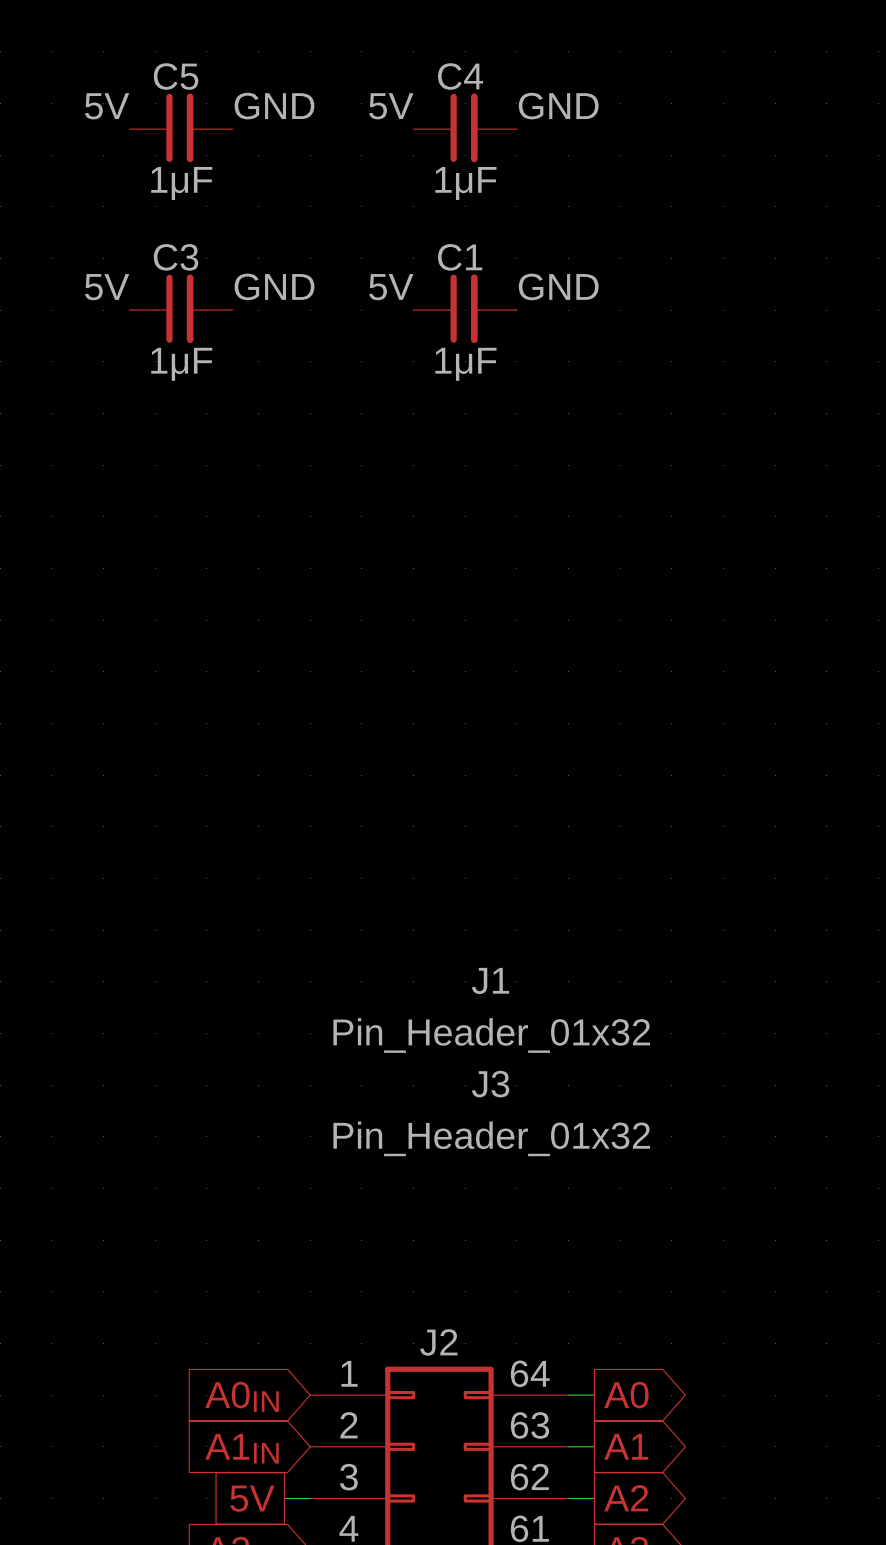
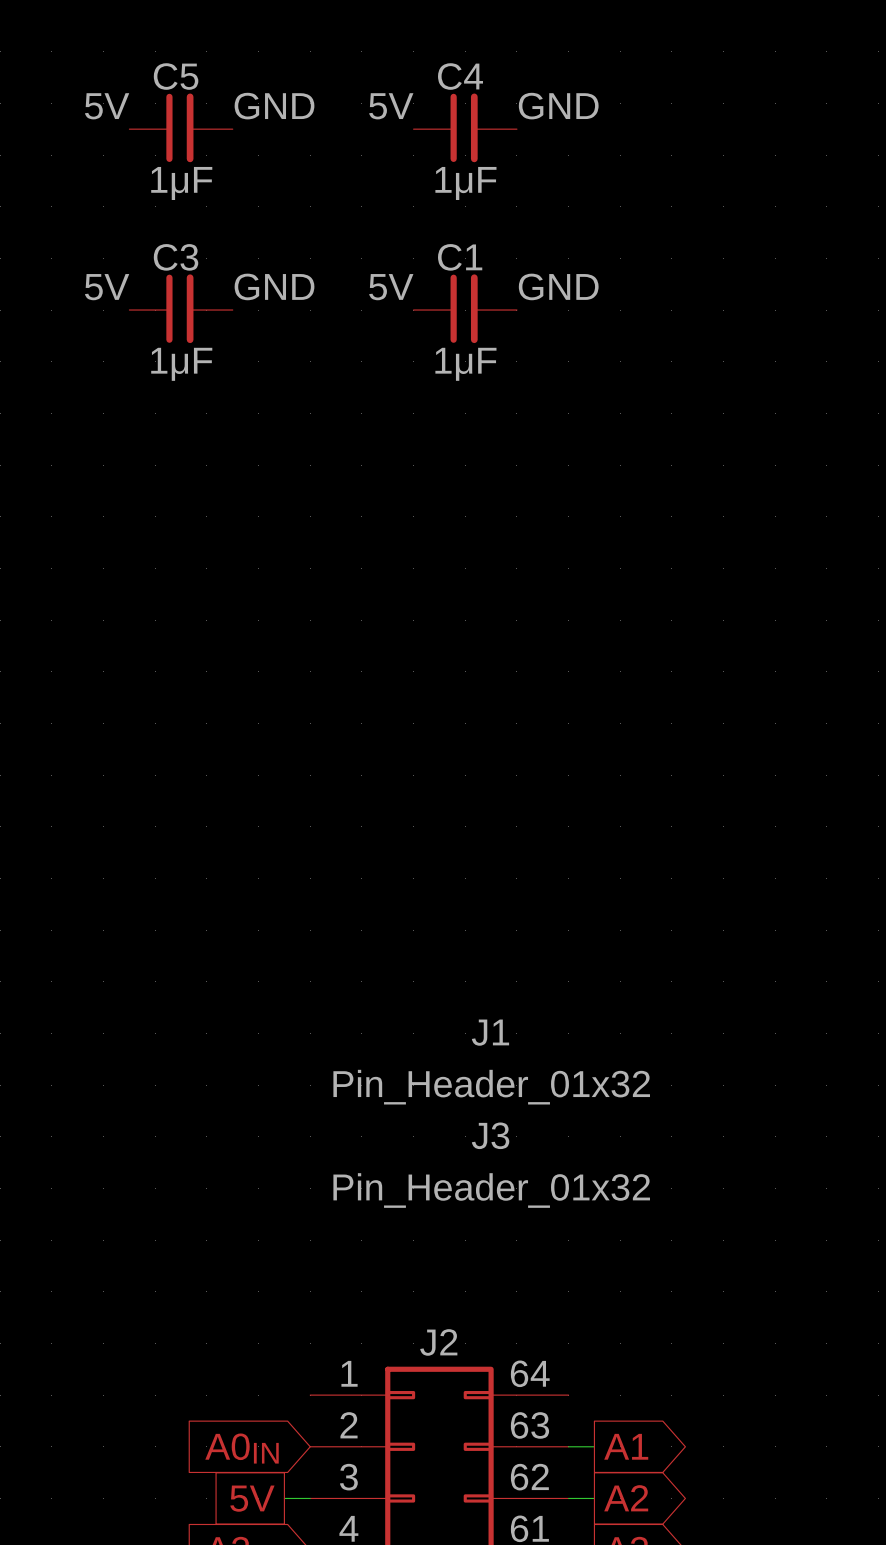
J1 position: (491, 1010) -> (491, 1062)
J3 position: (491, 1113) -> (491, 1165)
wire: (568, 1395) (594, 1395) -> none
global label: A0 (626, 1395) -> none
global label: A0IN (242, 1396) -> none
global label: A1IN (242, 1448) -> A0IN (242, 1448)

